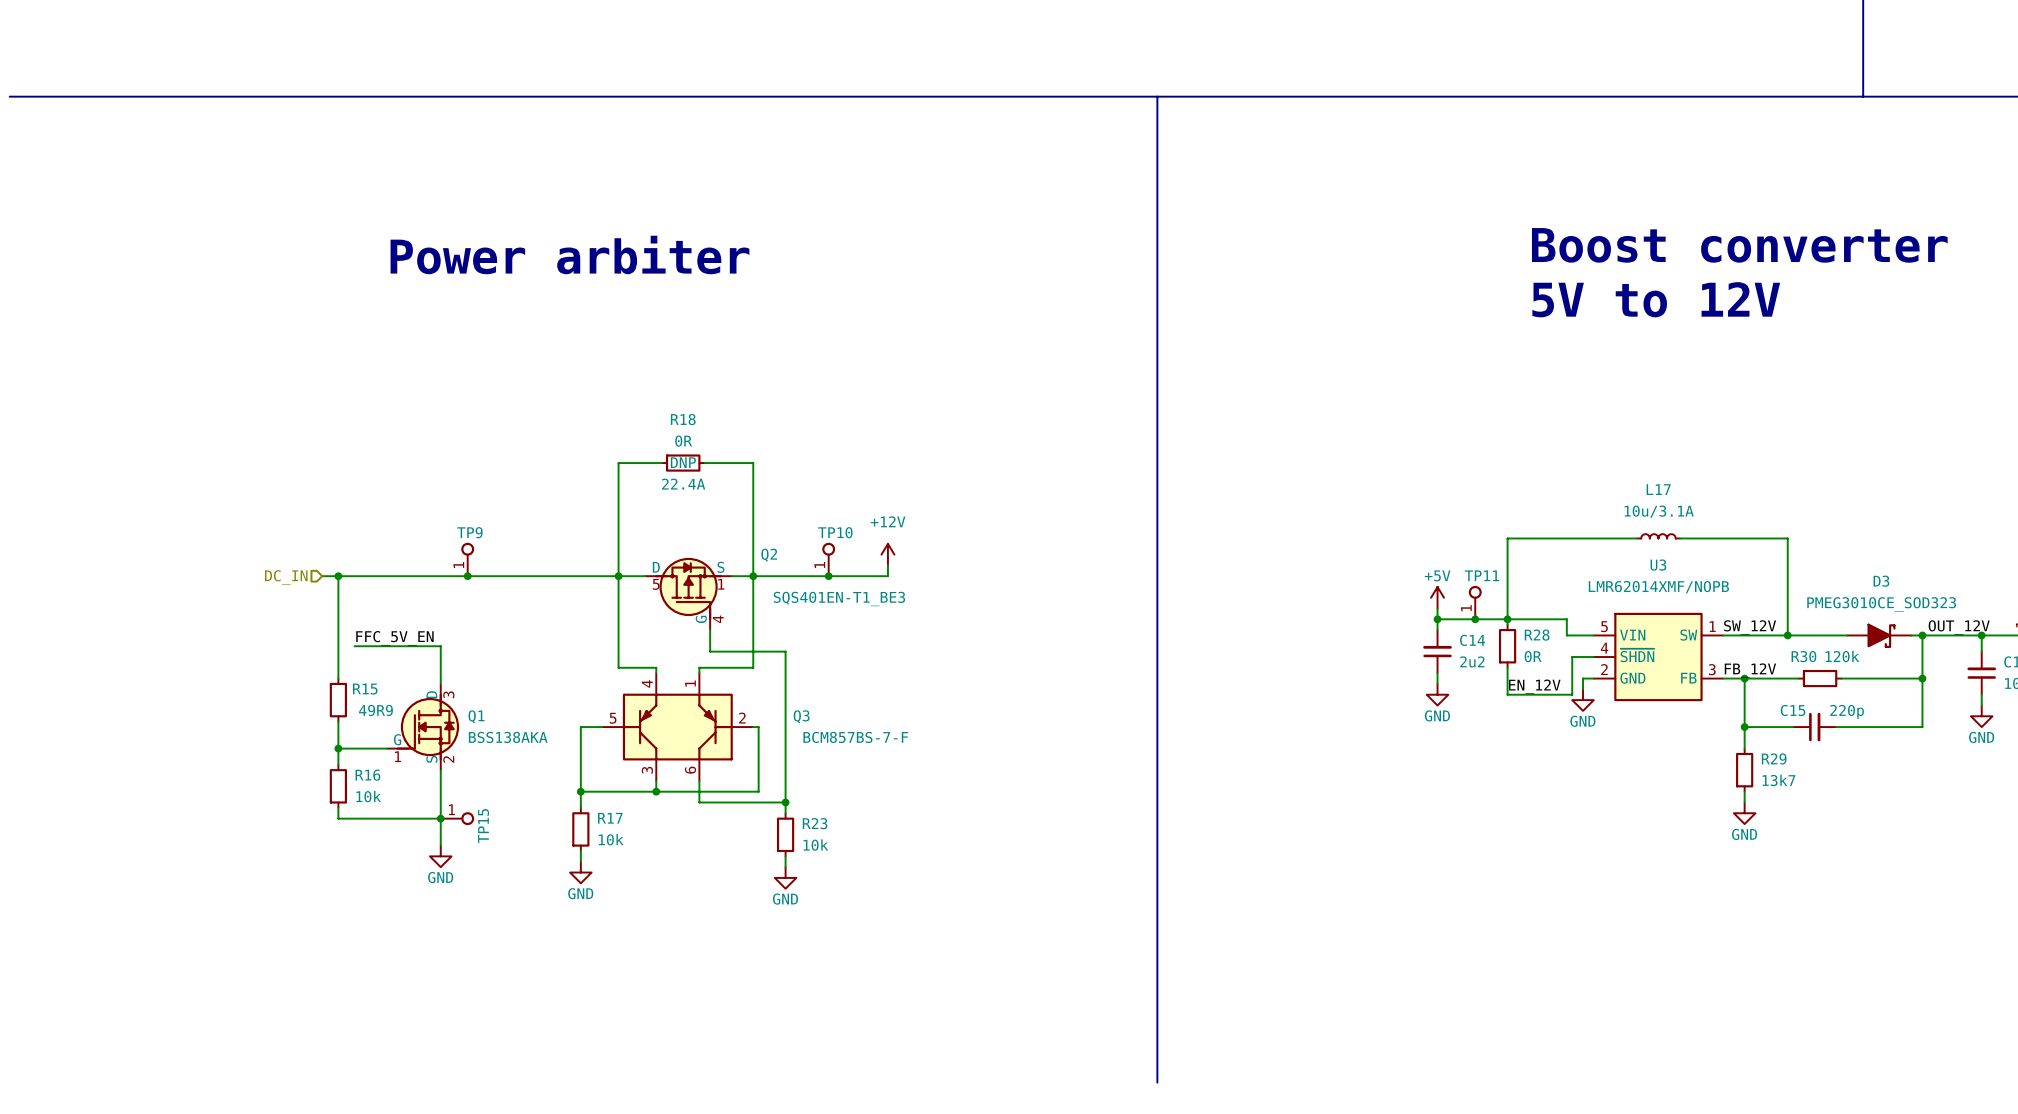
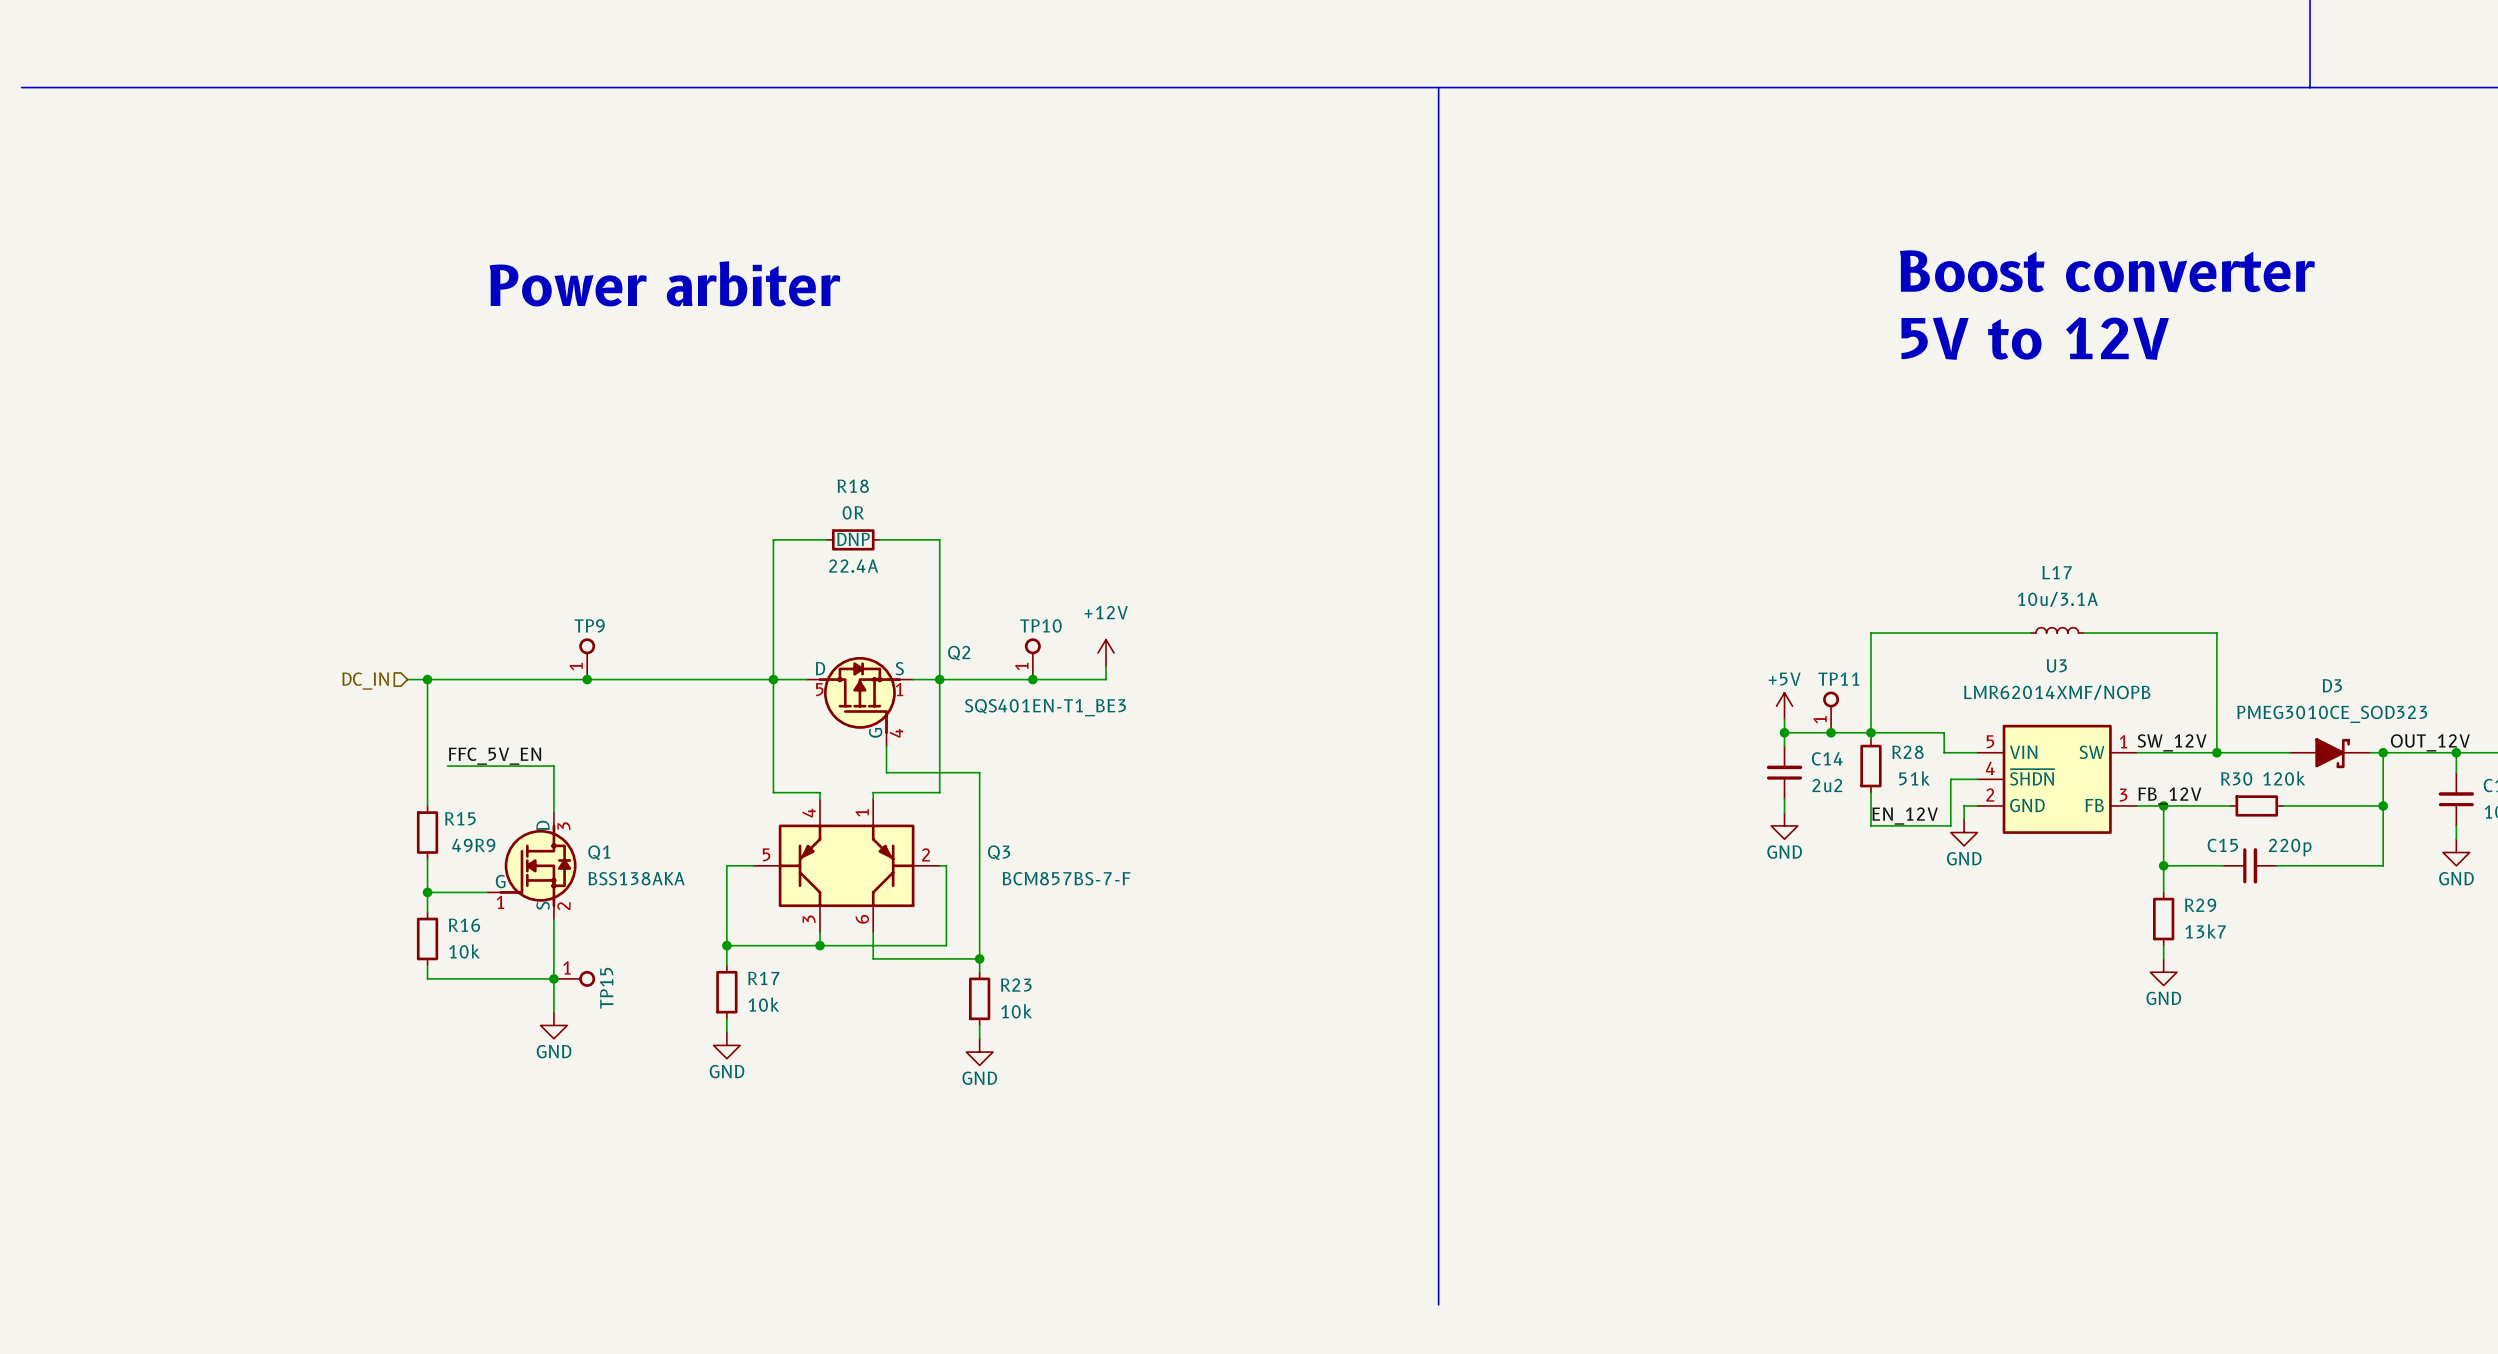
R28 text: 0R (1533, 656) -> 51k (1914, 778)

